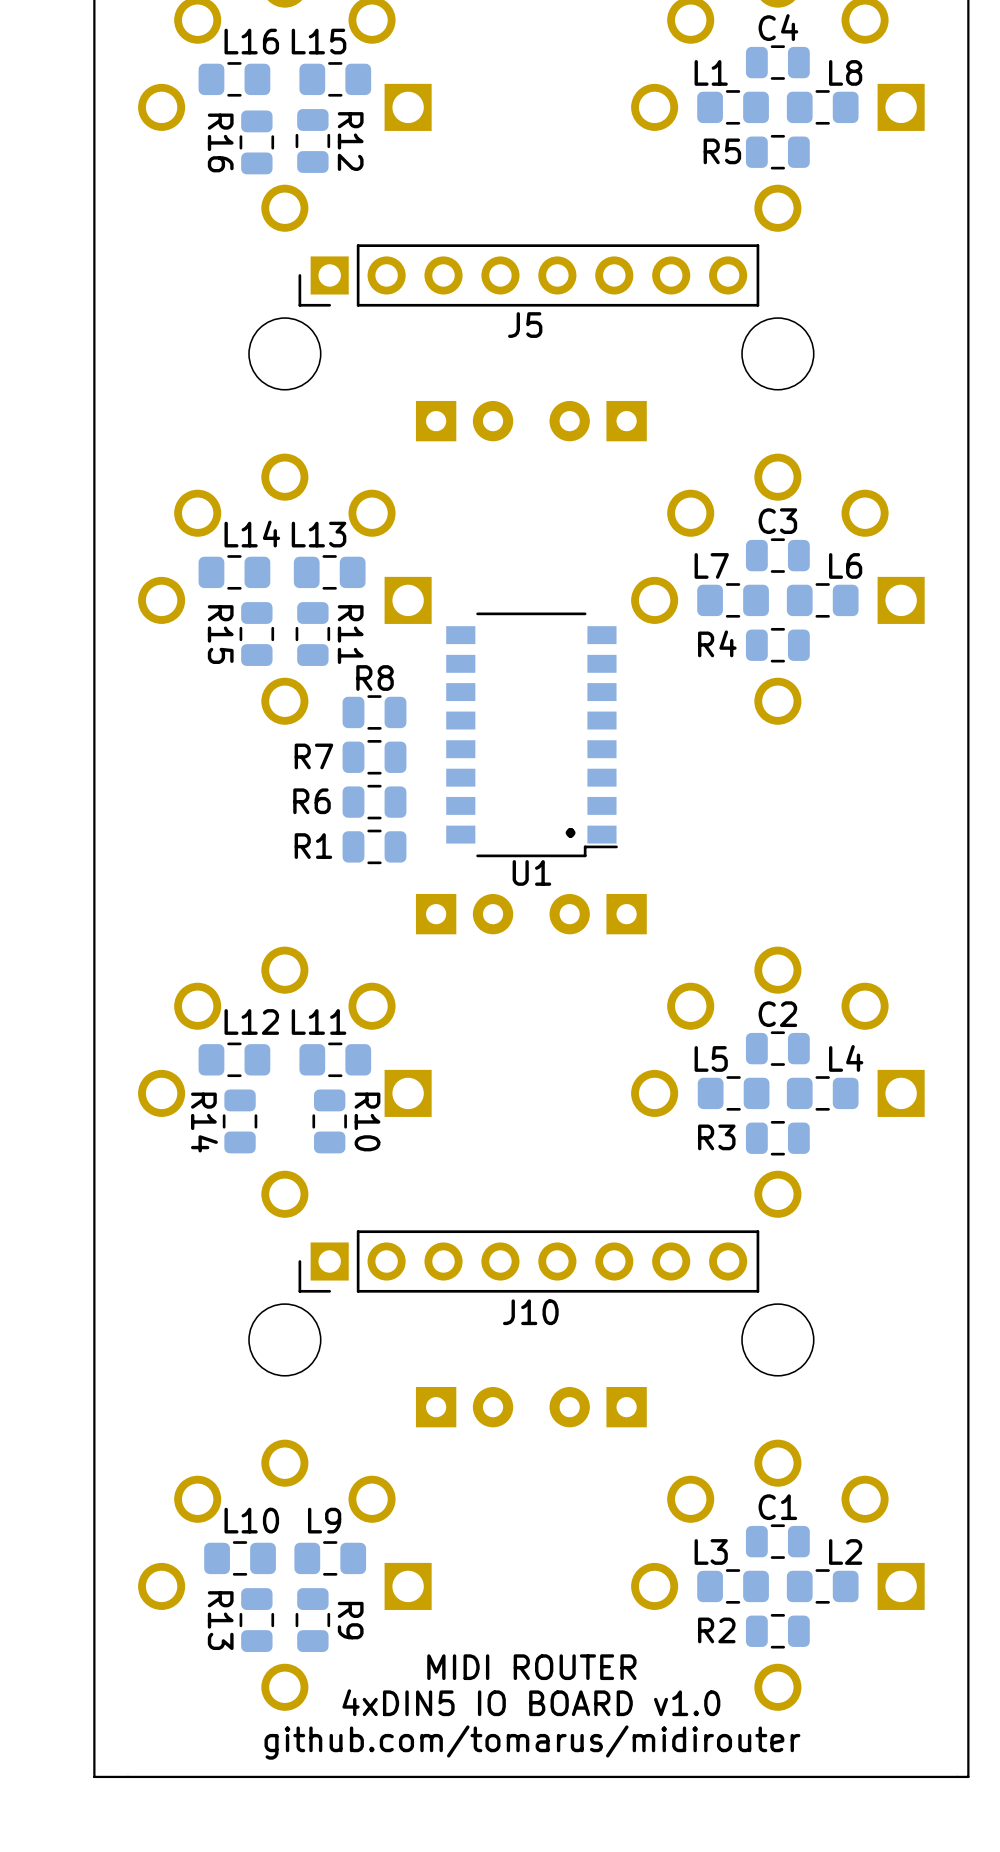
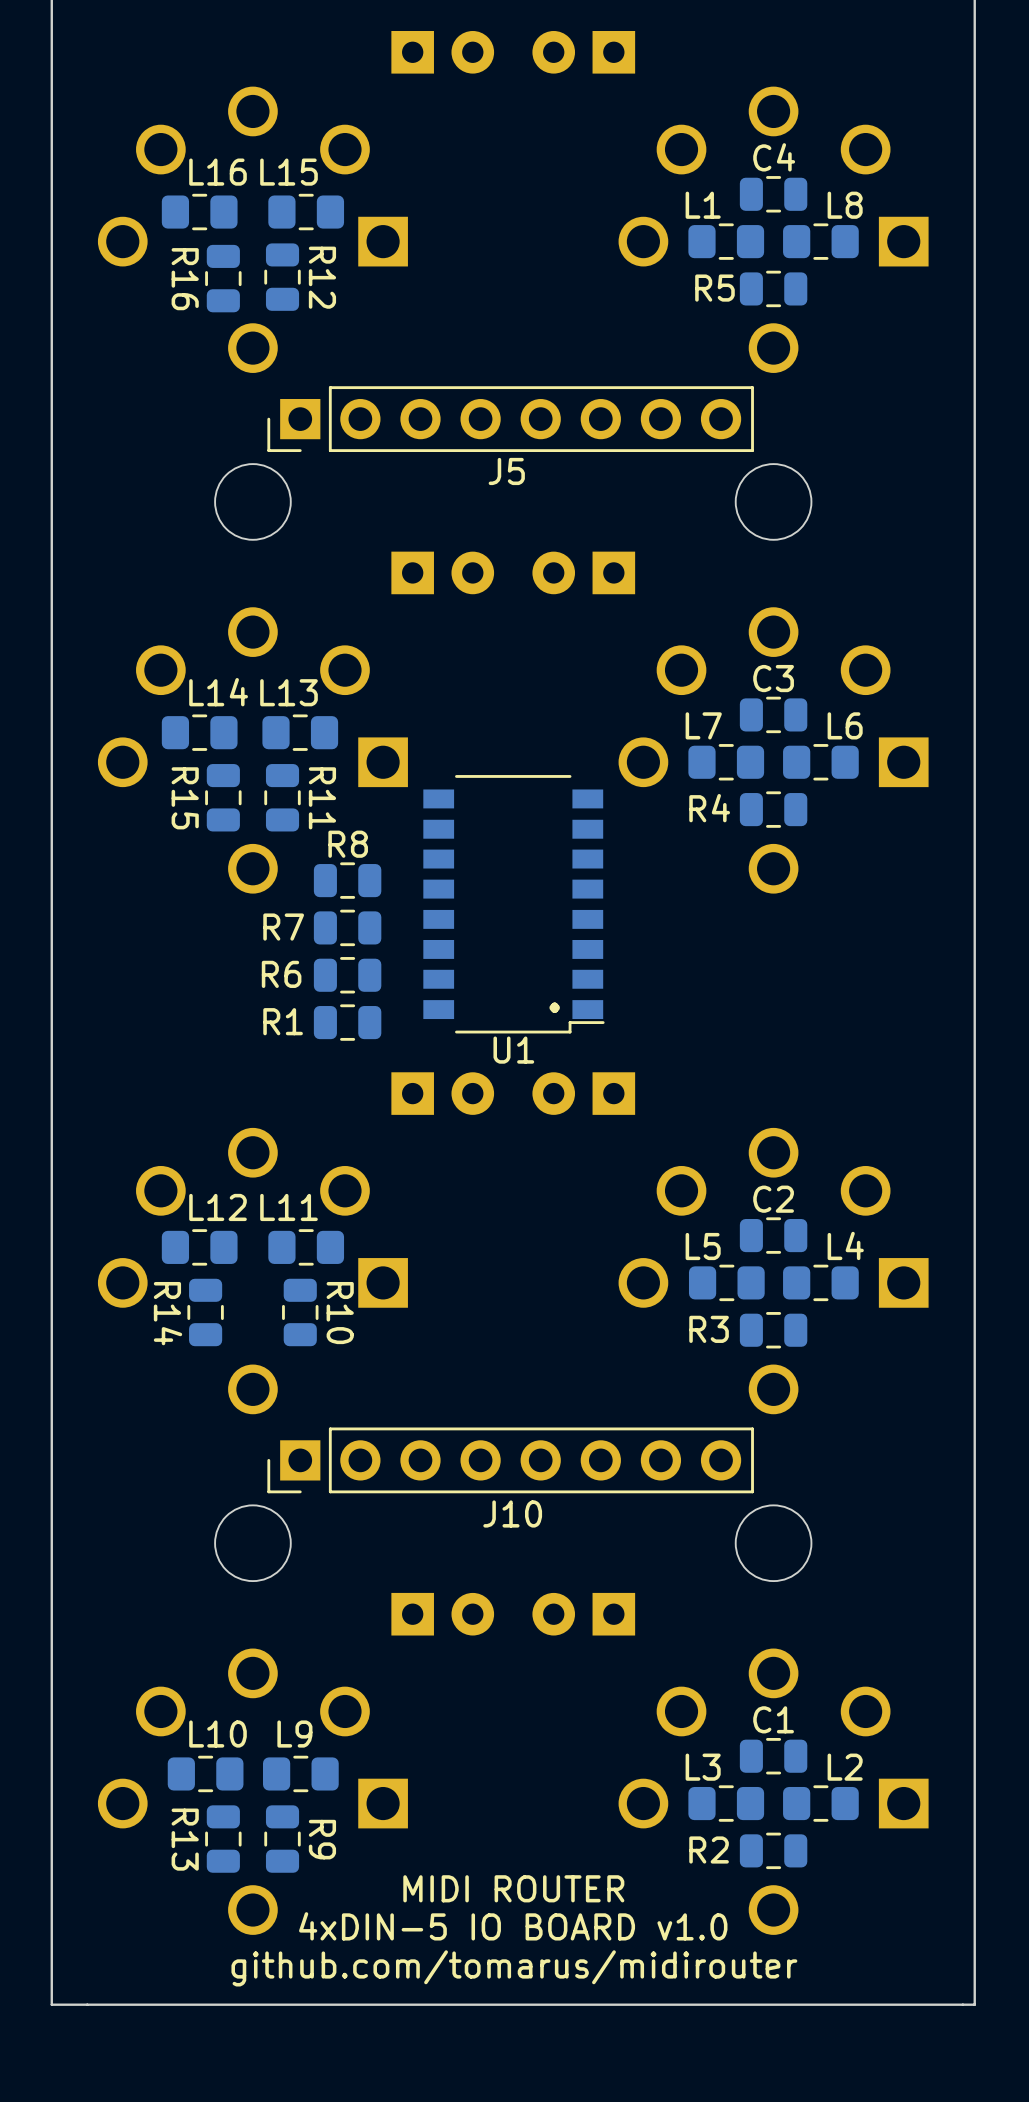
text: 4xDIN5 IO BOARD v1.0 (531, 1702) -> 4xDIN-5 IO BOARD v1.0 (513, 1926)

